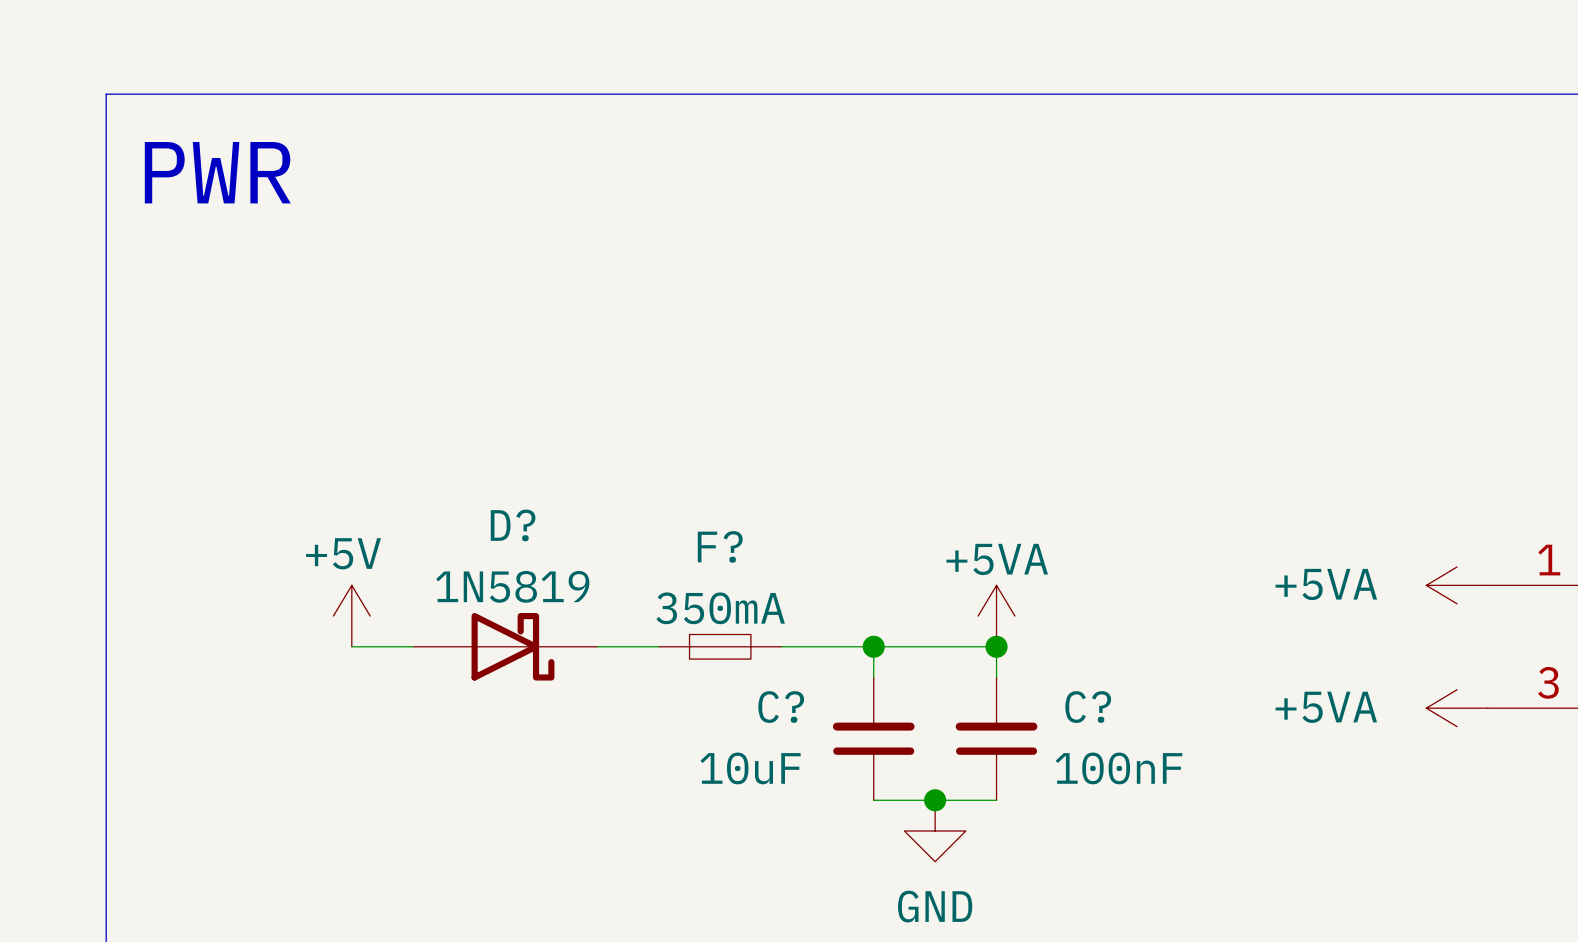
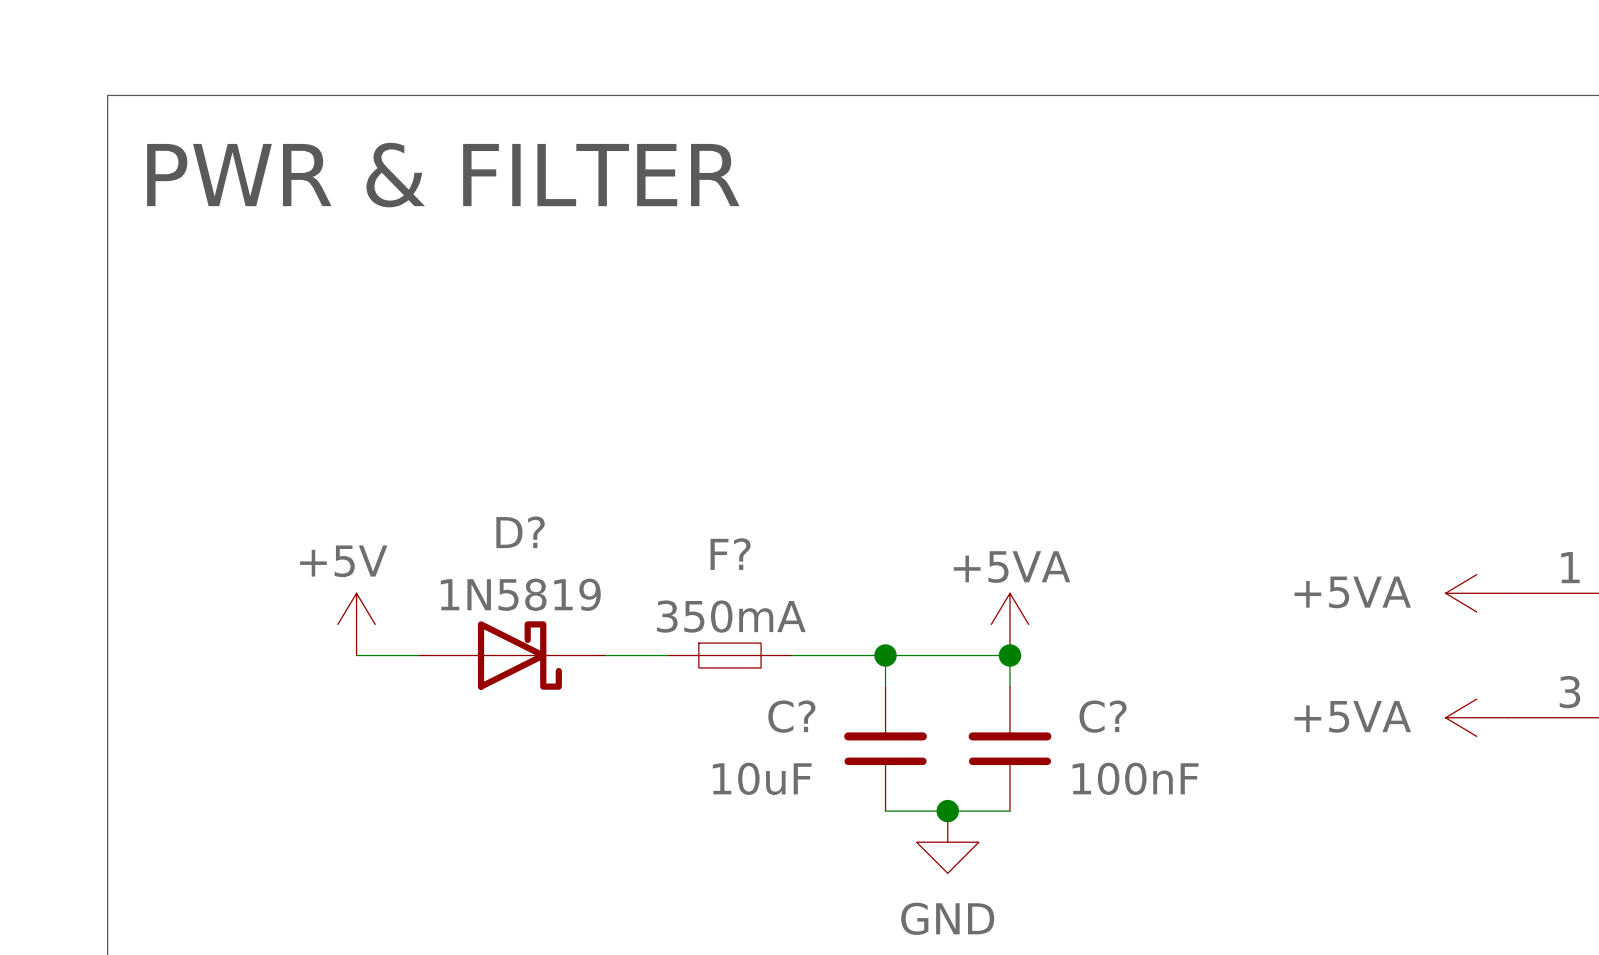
text: PWR (217, 172) -> PWR & FILTER (443, 175)

